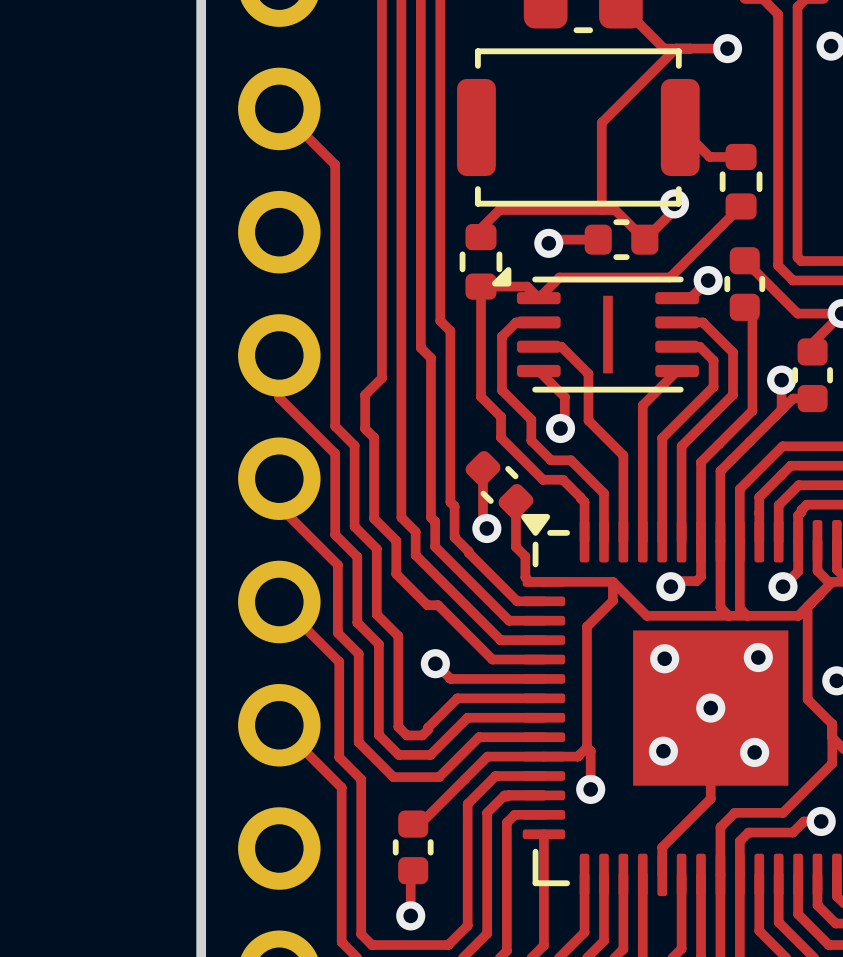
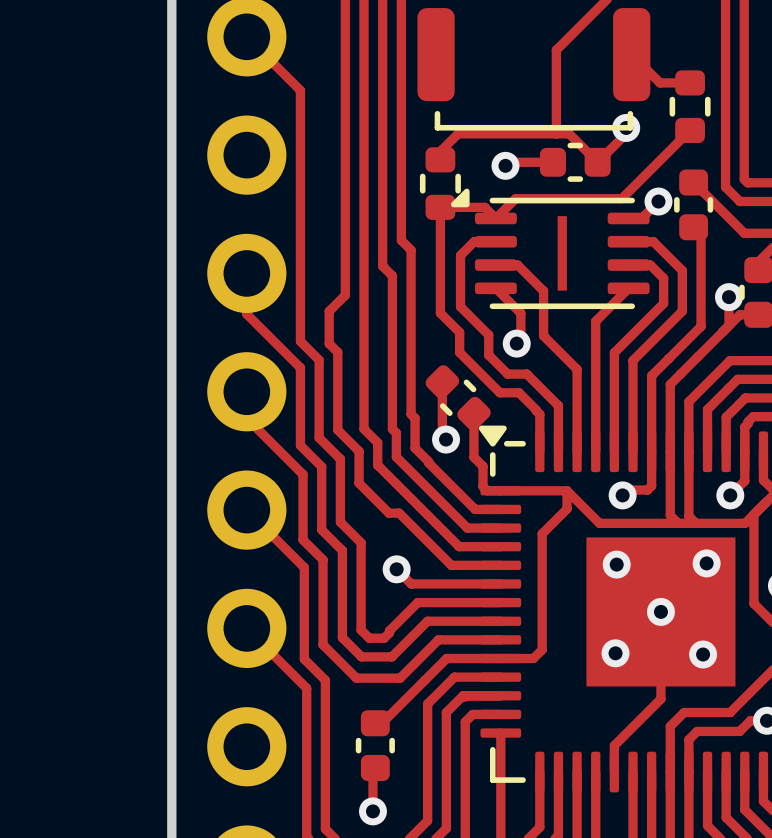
track: (587, 747) (590, 751) (590, 789) -> none
via: (590, 789) -> none

